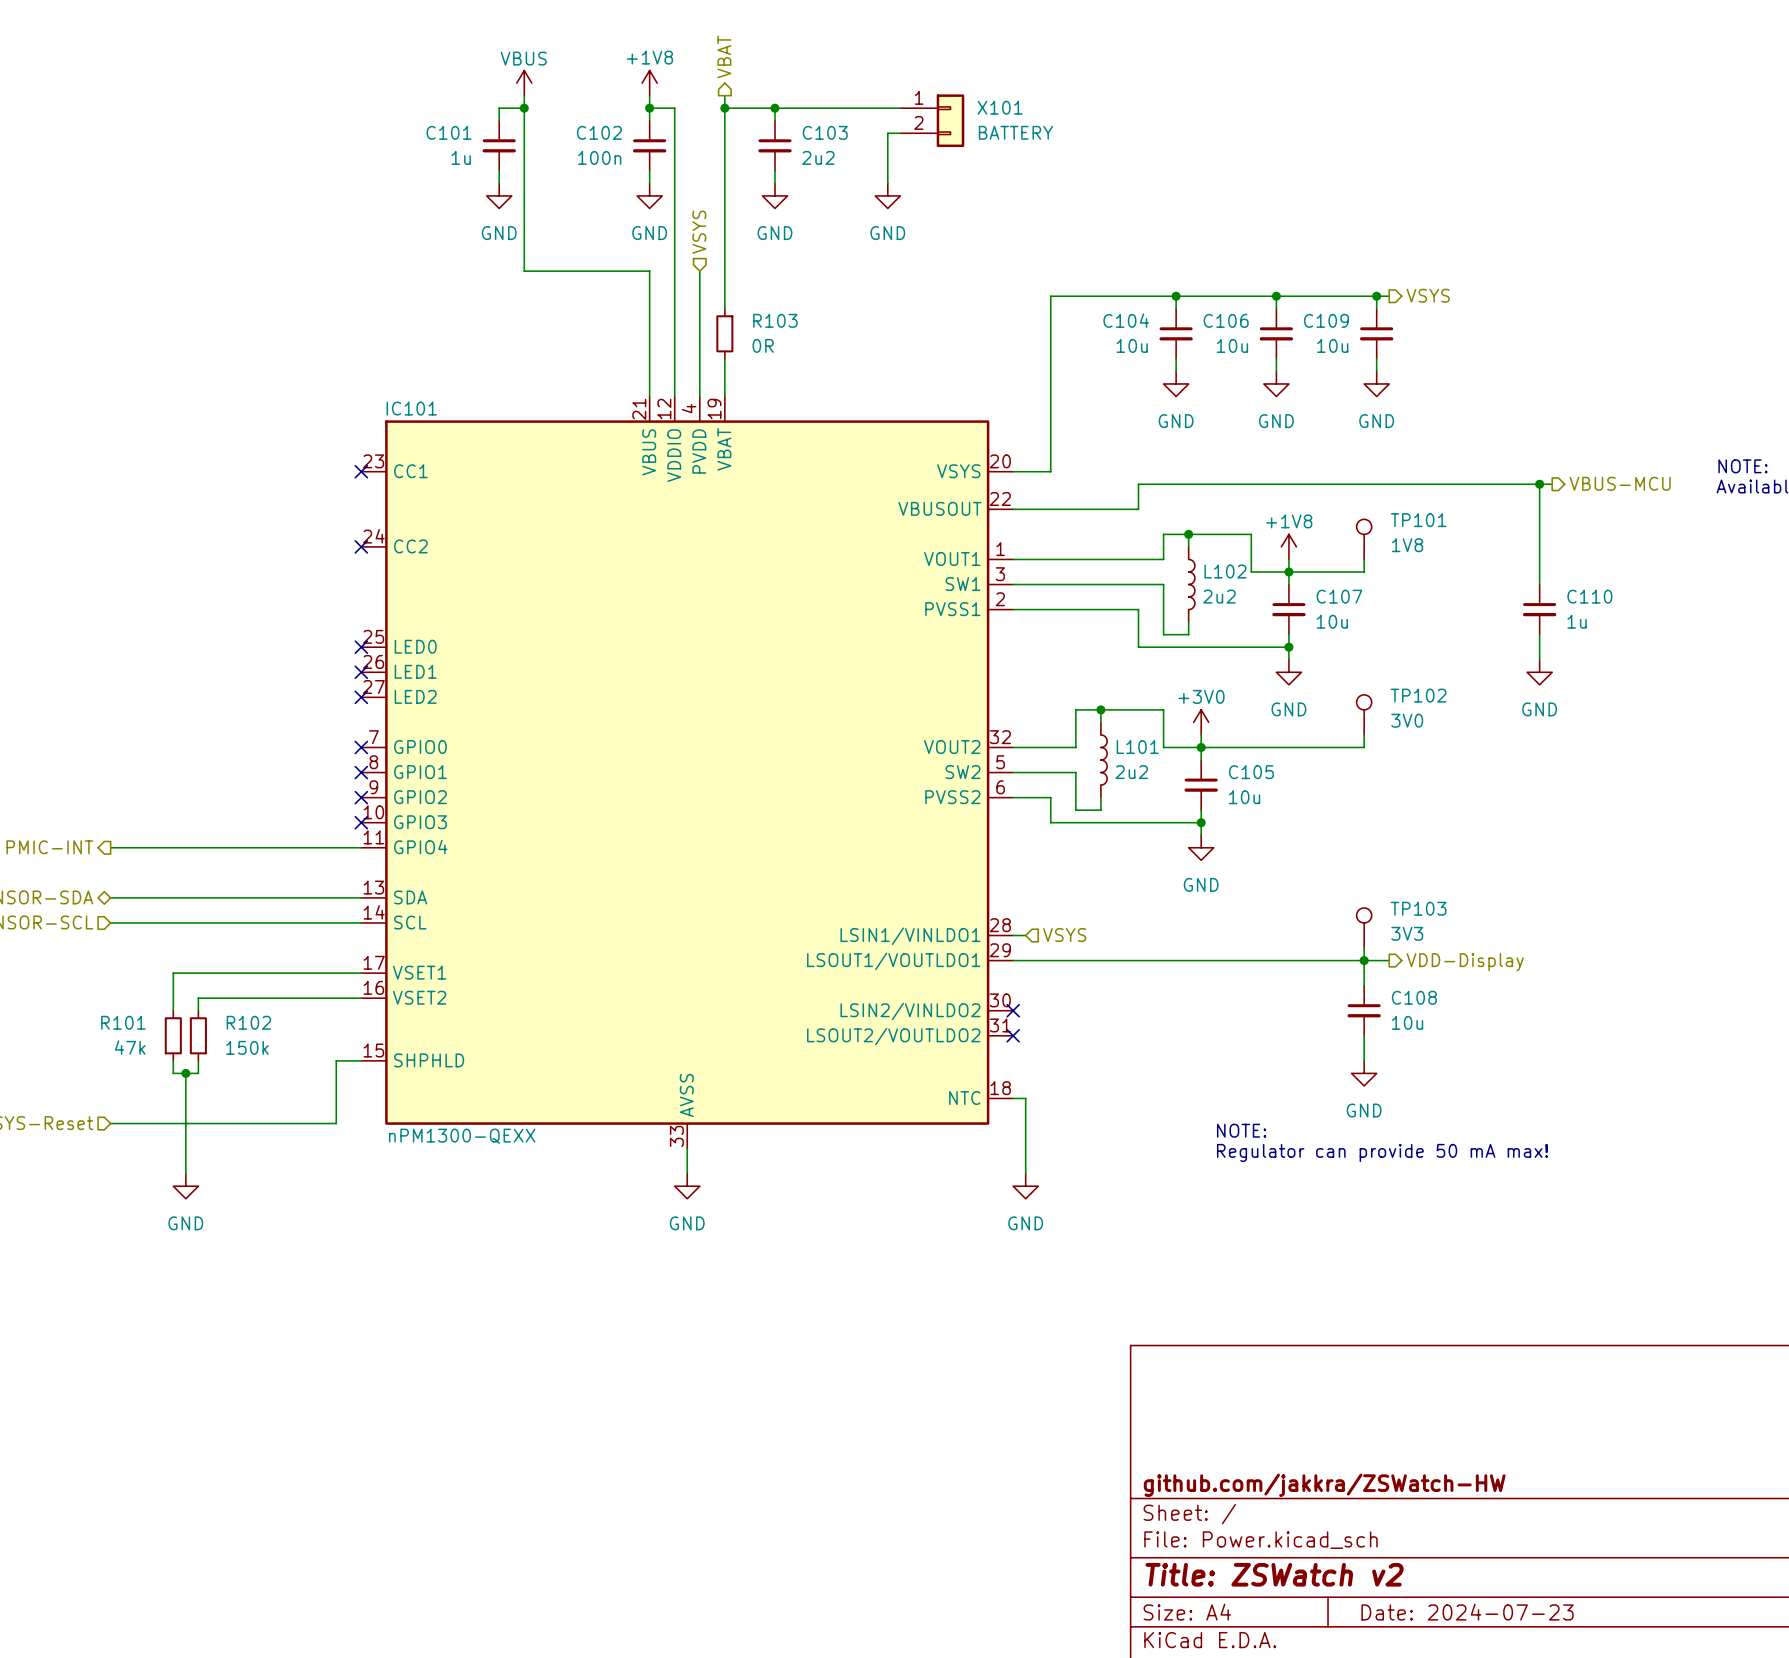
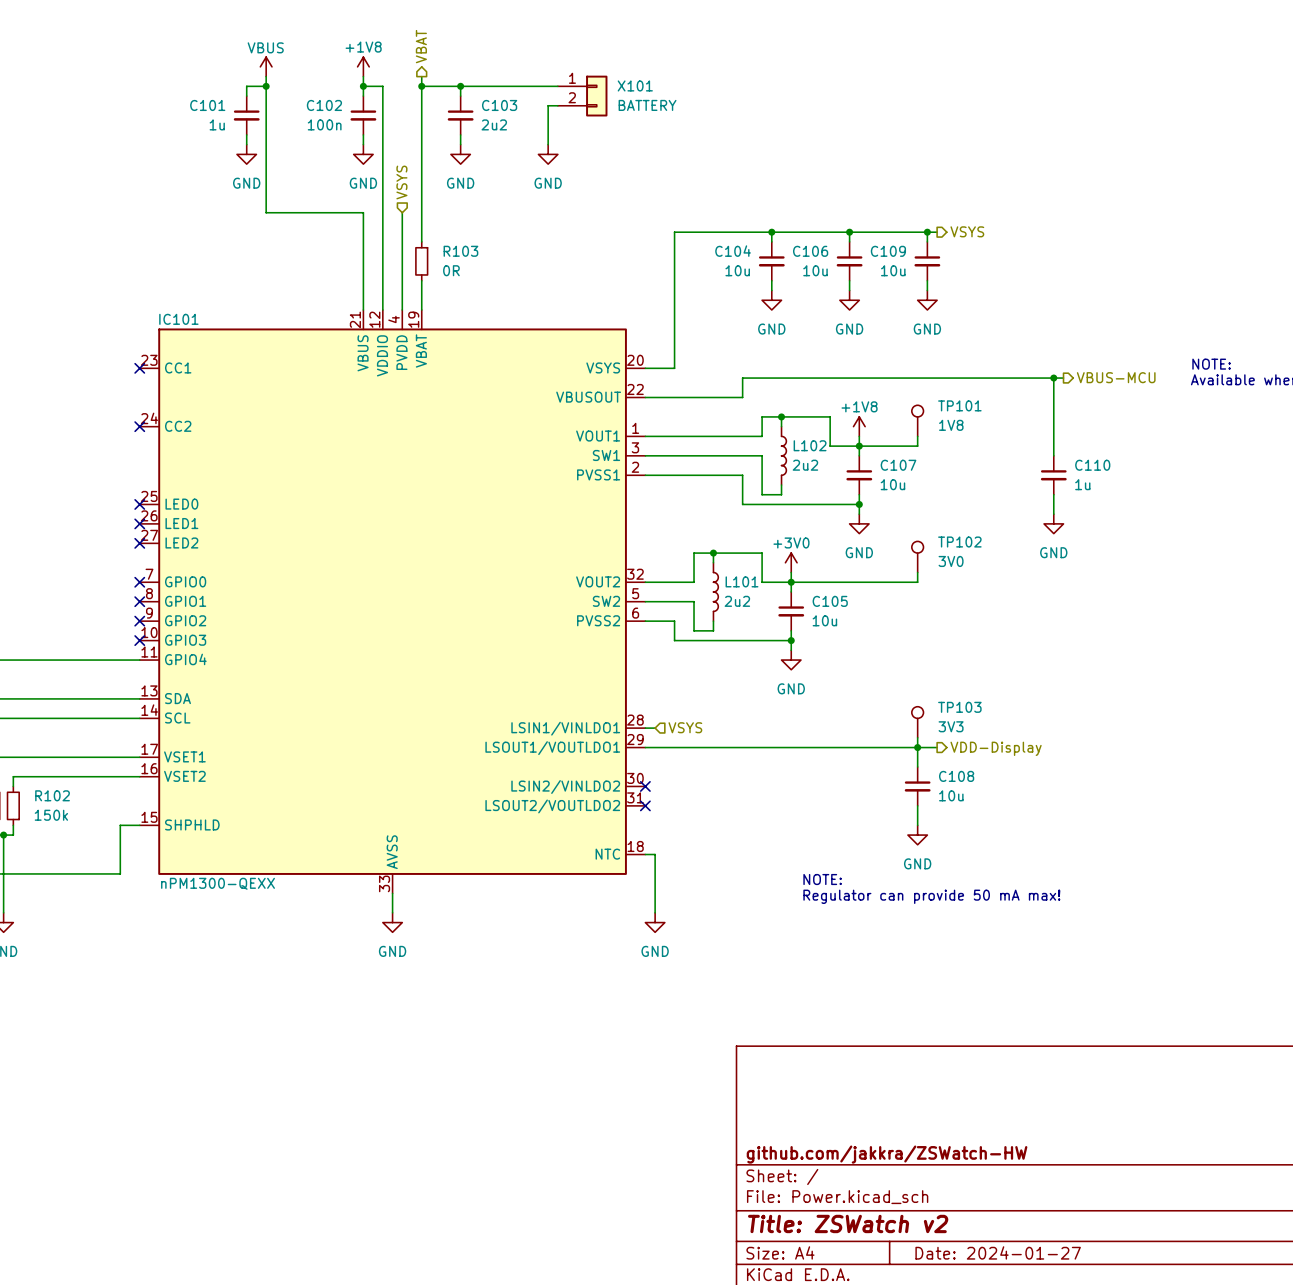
title block: Date: 2024-07-23 (1467, 1612) -> Date: 2024-01-27 (998, 1252)

